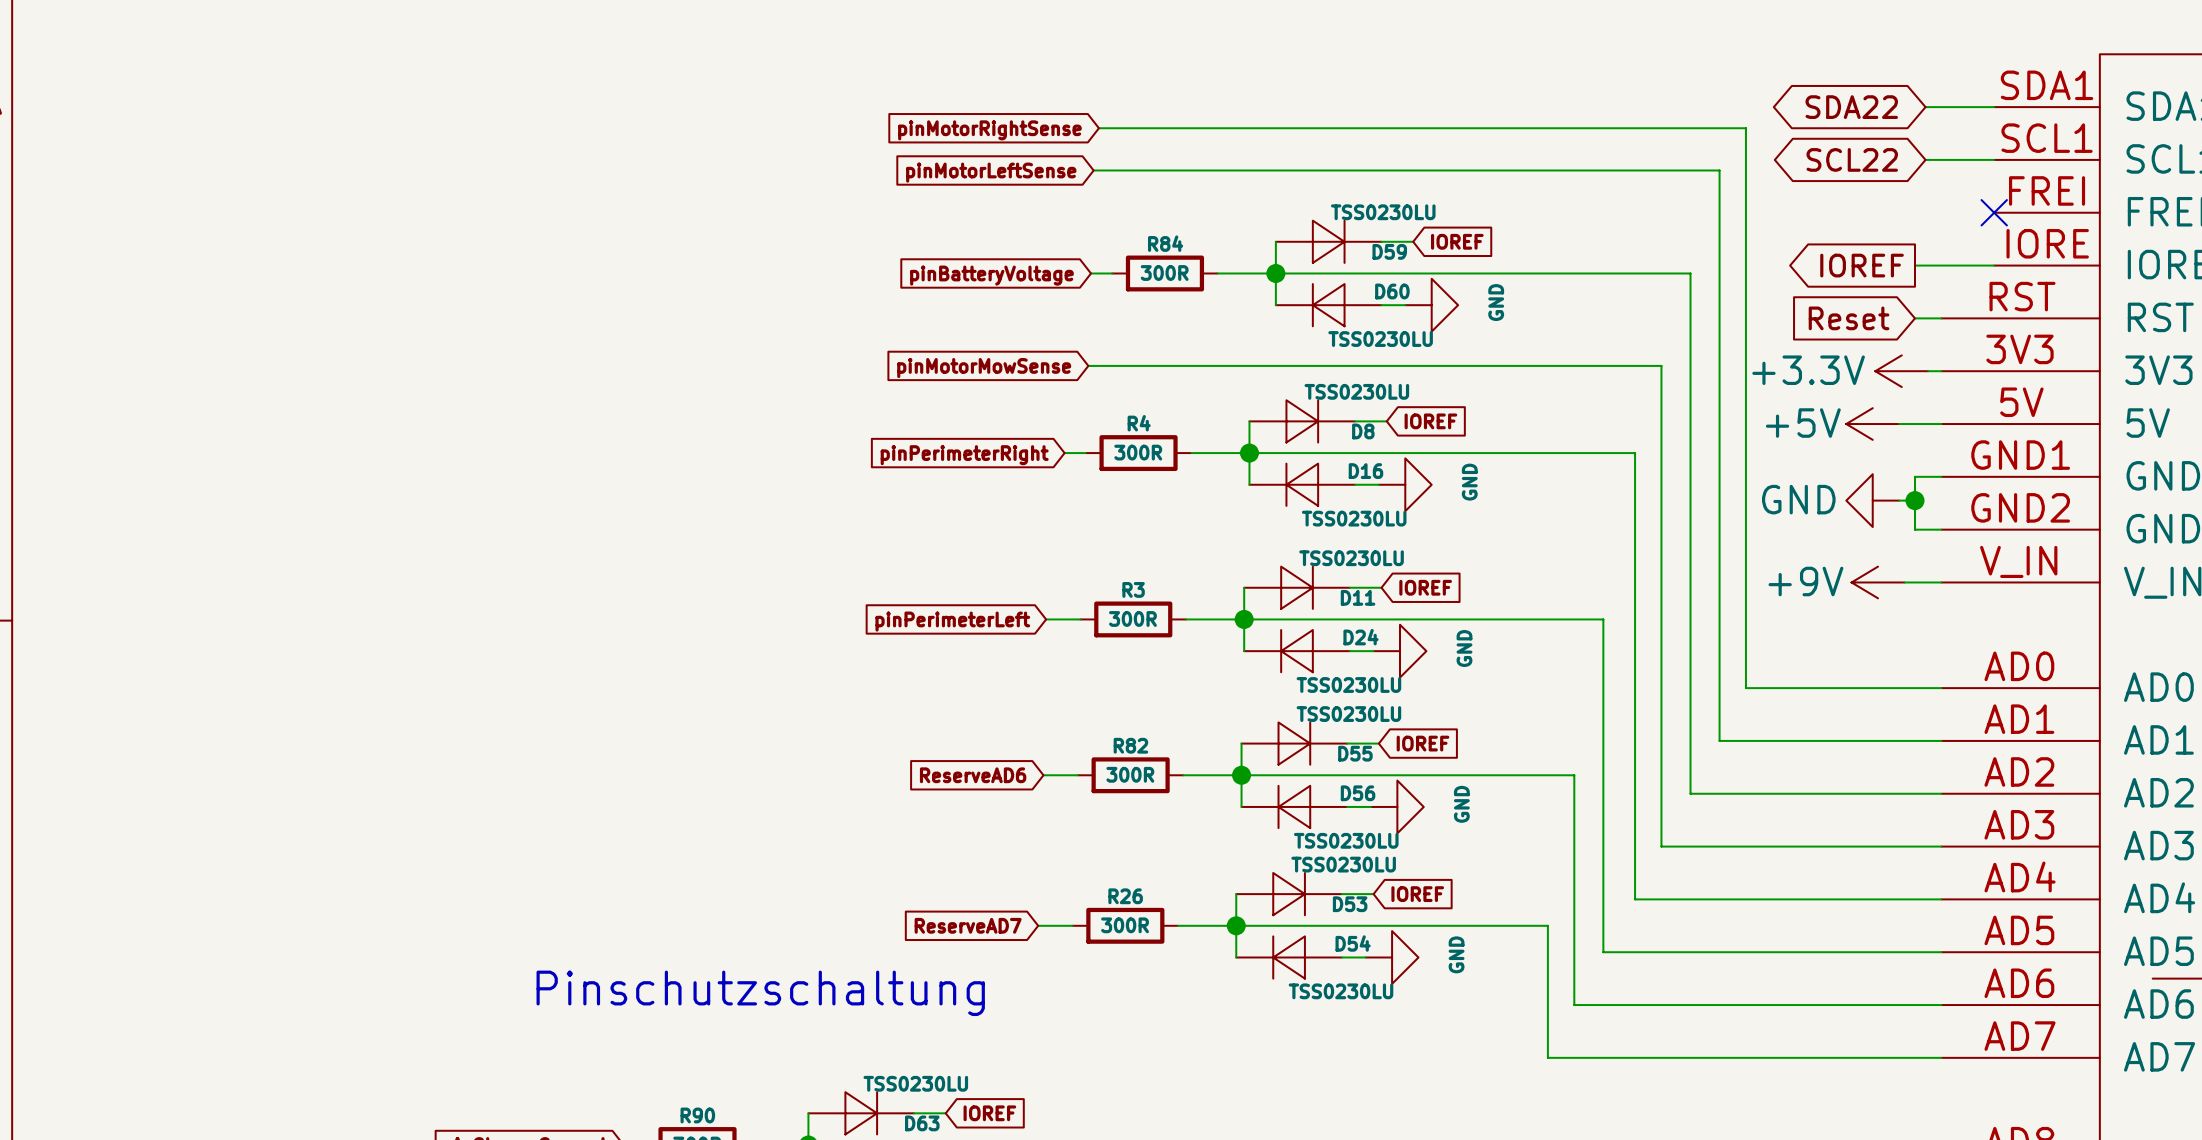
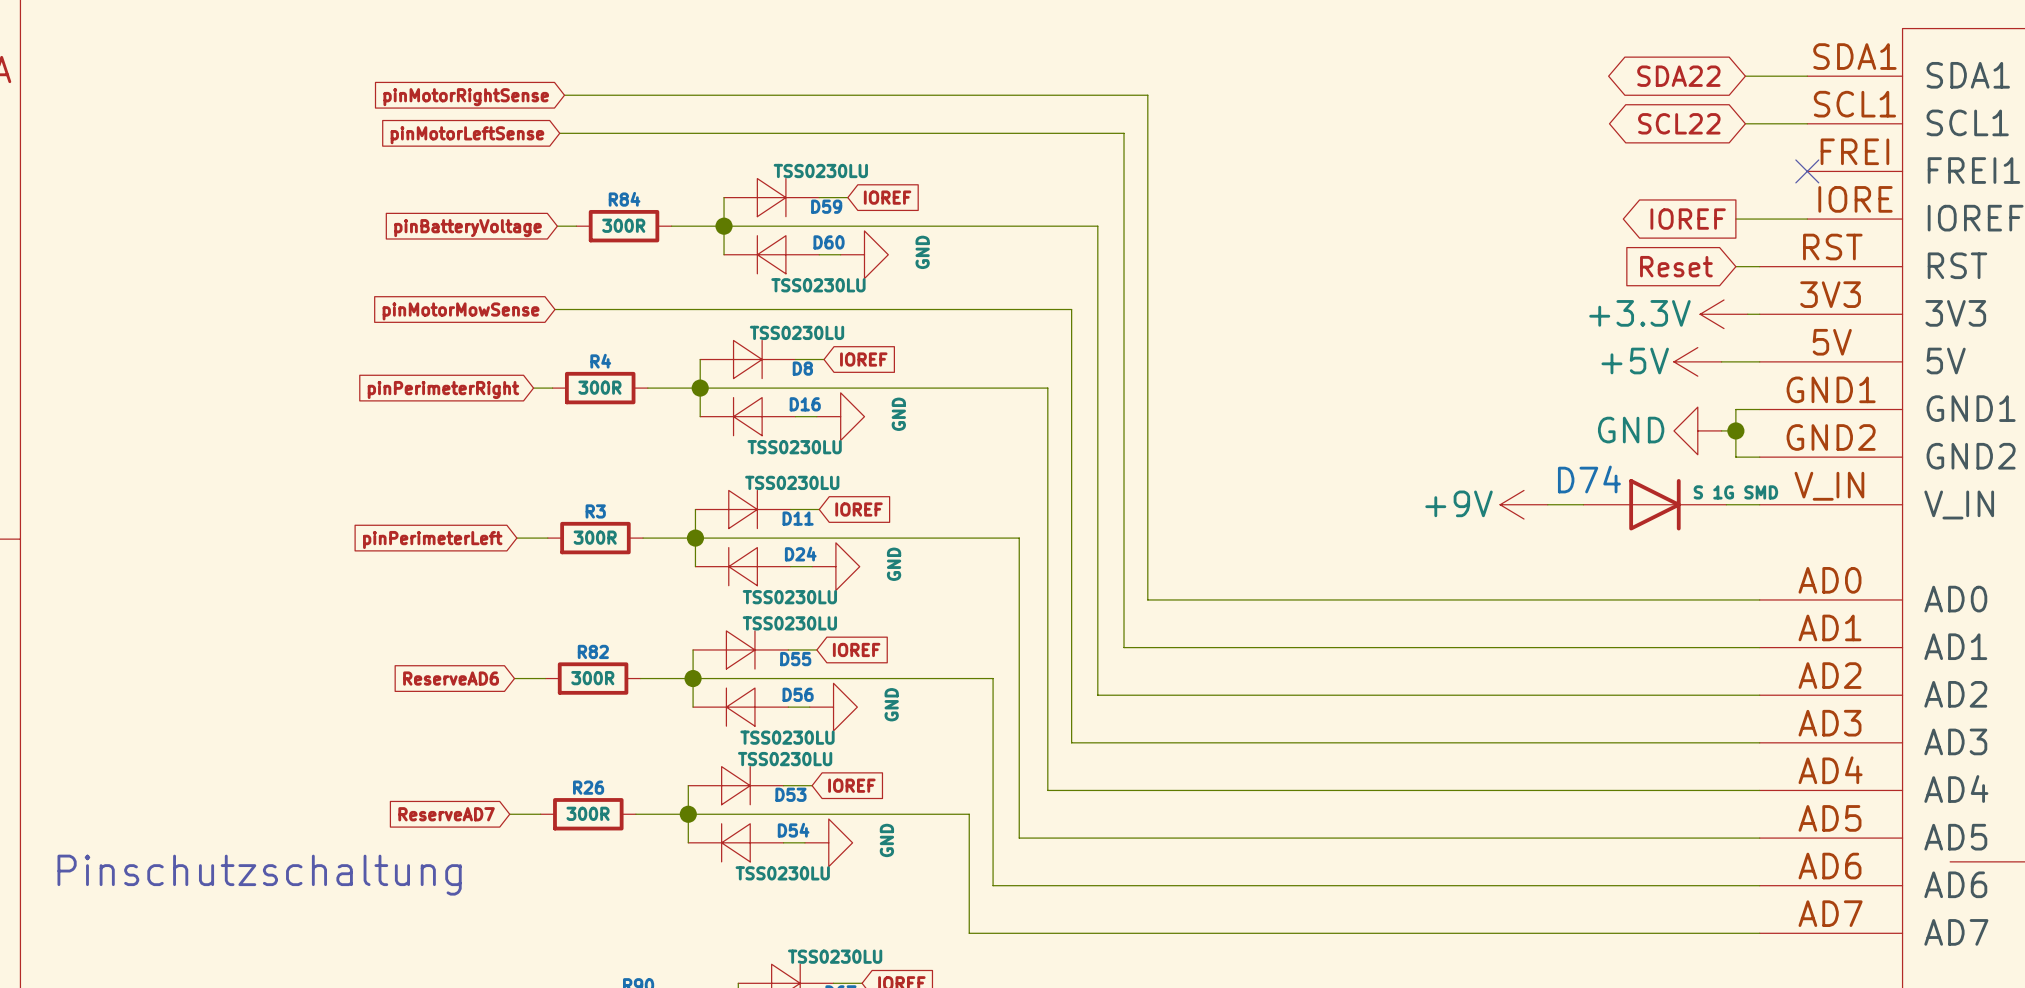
wire: none -> (564, 95) (1000, 95)
wire: (1262, 128) (1745, 128) (1745, 688) -> (1147, 95) (1147, 599) (1583, 599)
global label position: pinMotorRightSense (989, 130) -> pinMotorRightSense (466, 97)
wire: none -> (559, 133) (995, 133)
wire: (1236, 170) (1719, 170) (1719, 740) -> (1124, 133) (1124, 647) (1559, 647)
global label position: pinMotorLeftSense (991, 172) -> pinMotorLeftSense (467, 135)
global label: none -> IOREF (887, 197)
wire: (1275, 241) (1275, 305) -> (724, 197) (724, 254)
D59 position: (1328, 241) -> (771, 197)
wire: (1381, 241) (1413, 241) -> (819, 197) (847, 197)
global label: IOREF (1457, 241) -> none
wire: none -> (557, 226) (576, 226)
wire: none -> (671, 226) (993, 226)
junction: none -> (724, 226)
R84 position: (1164, 273) -> (624, 226)
wire: (1217, 273) (1690, 273) (1690, 793) -> (1012, 226) (1097, 226) (1097, 695) (1533, 695)
junction: (1275, 273) -> none
global label position: pinBatteryVoltage (991, 275) -> pinBatteryVoltage (468, 228)
power symbol: none -> GND (864, 254)
D60 position: (1328, 305) -> (771, 254)
wire: (1381, 305) (1405, 305) -> (819, 254) (840, 254)
power symbol: GND (1431, 305) -> none
wire: none -> (554, 309) (990, 309)
wire: (1178, 365) (1661, 365) (1661, 846) -> (1071, 309) (1071, 742) (1507, 742)
global label position: pinMotorMowSense (984, 368) -> pinMotorMowSense (461, 311)
global label: none -> IOREF (863, 359)
wire: (1249, 421) (1249, 484) -> (700, 359) (700, 416)
D8 position: (1302, 421) -> (747, 359)
wire: (1355, 421) (1386, 421) -> (795, 359) (824, 359)
global label: IOREF (1430, 421) -> none
wire: none -> (533, 388) (552, 388)
wire: none -> (647, 388) (969, 388)
junction: none -> (700, 388)
R4 position: (1138, 453) -> (600, 388)
wire: (1191, 453) (1635, 453) (1635, 899) -> (988, 388) (1047, 388) (1047, 790) (1483, 790)
junction: (1249, 453) -> none
global label position: pinPerimeterRight (964, 455) -> pinPerimeterRight (443, 389)
power symbol: none -> GND (840, 416)
D16 position: (1302, 484) -> (747, 416)
wire: (1355, 484) (1378, 484) -> (795, 416) (816, 416)
power symbol: GND (1405, 484) -> none
wire: none -> (1547, 504) (1583, 504)
D74: none -> S 1G SMD (1654, 504)
power symbol position: +9V (1878, 582) -> +9V (1523, 504)
global label: none -> IOREF (859, 509)
wire: (1244, 587) (1244, 651) -> (695, 509) (695, 566)
D11 position: (1297, 587) -> (743, 509)
wire: (1349, 587) (1381, 587) -> (790, 509) (819, 509)
global label: IOREF (1425, 587) -> none
wire: none -> (516, 538) (547, 538)
wire: none -> (643, 538) (952, 538)
junction: none -> (695, 538)
R3 position: (1133, 619) -> (595, 538)
wire: (1186, 619) (1603, 619) (1603, 952) -> (983, 538) (1019, 538) (1019, 838) (1454, 838)
junction: (1244, 619) -> none
global label position: pinPerimeterLeft (952, 621) -> pinPerimeterLeft (432, 539)
power symbol: none -> GND (835, 566)
D24 position: (1297, 651) -> (743, 566)
wire: (1349, 651) (1373, 651) -> (790, 566) (812, 566)
power symbol: GND (1400, 651) -> none
global label: none -> IOREF (856, 649)
wire: (1241, 743) (1241, 806) -> (693, 649) (693, 707)
D55 position: (1294, 743) -> (740, 649)
wire: (1347, 743) (1378, 743) -> (788, 649) (816, 649)
global label: IOREF (1422, 743) -> none
wire: none -> (514, 678) (545, 678)
wire: none -> (640, 678) (950, 678)
junction: none -> (693, 678)
global label position: ReserveAD6 (973, 775) -> ReserveAD6 (451, 678)
R82 position: (1130, 775) -> (593, 678)
wire: (1183, 775) (1574, 775) (1574, 1005) -> (981, 678) (993, 678) (993, 885) (1428, 885)
junction: (1241, 775) -> none
power symbol: none -> GND (833, 707)
D56 position: (1294, 806) -> (740, 707)
wire: (1347, 806) (1370, 806) -> (788, 707) (809, 707)
power symbol: GND (1397, 806) -> none
global label: none -> IOREF (851, 785)
wire: (1236, 894) (1236, 957) -> (688, 785) (688, 842)
D53 position: (1289, 894) -> (735, 785)
wire: (1341, 894) (1373, 894) -> (783, 785) (812, 785)
global label: IOREF (1417, 894) -> none
wire: none -> (509, 814) (540, 814)
wire: none -> (635, 814) (945, 814)
junction: none -> (688, 814)
global label position: ReserveAD7 (968, 925) -> ReserveAD7 (446, 814)
wire: (1064, 925) (1072, 925) -> none
R26 position: (1125, 925) -> (588, 814)
wire: (1178, 925) (1547, 925) (1547, 1057) -> (969, 814) (969, 933) (1404, 933)
junction: (1236, 925) -> none
power symbol: none -> GND (828, 842)
D54 position: (1289, 957) -> (735, 842)
wire: (1341, 957) (1365, 957) -> (783, 842) (804, 842)
power symbol: GND (1392, 957) -> none
text position: Pinschutzschaltung (760, 993) -> Pinschutzschaltung (259, 875)

